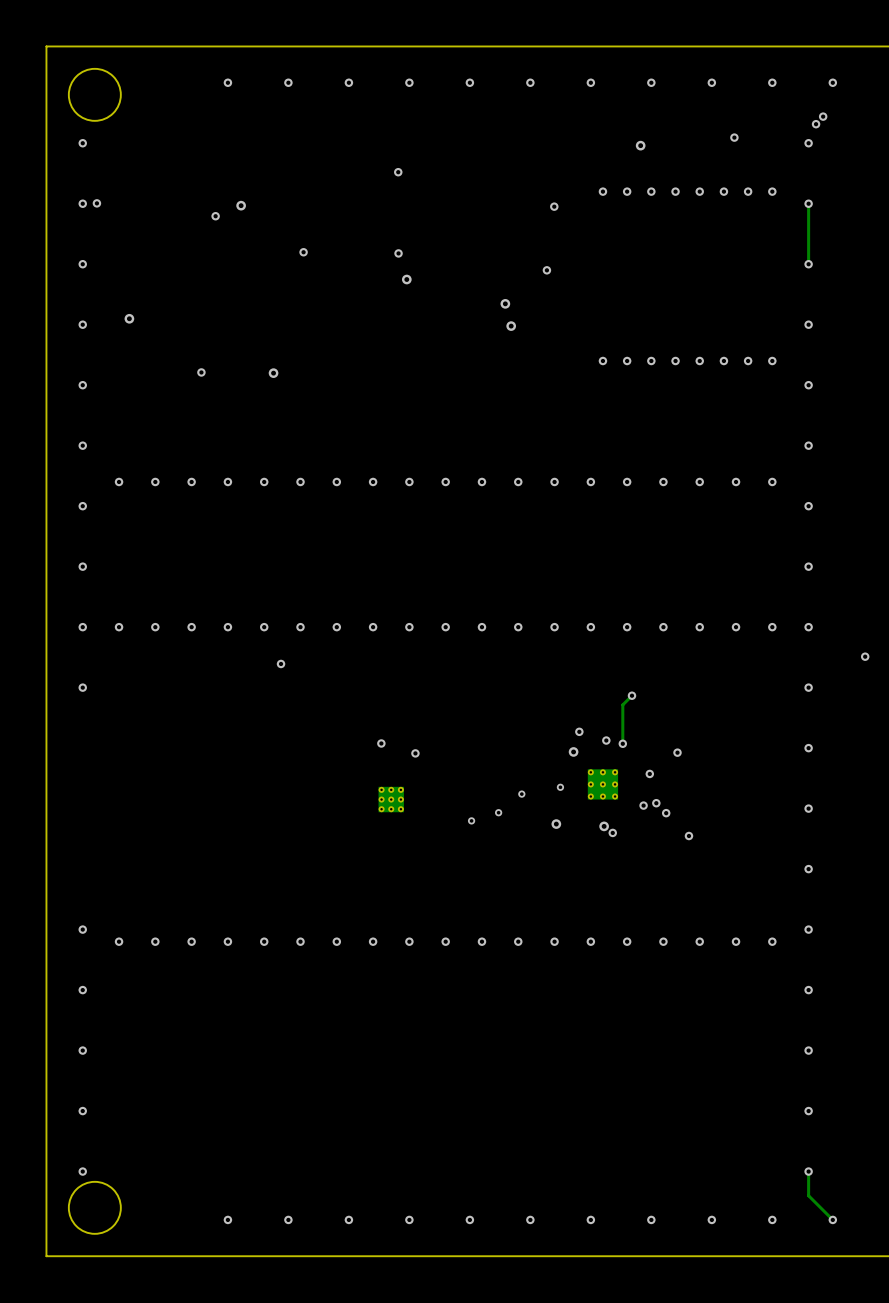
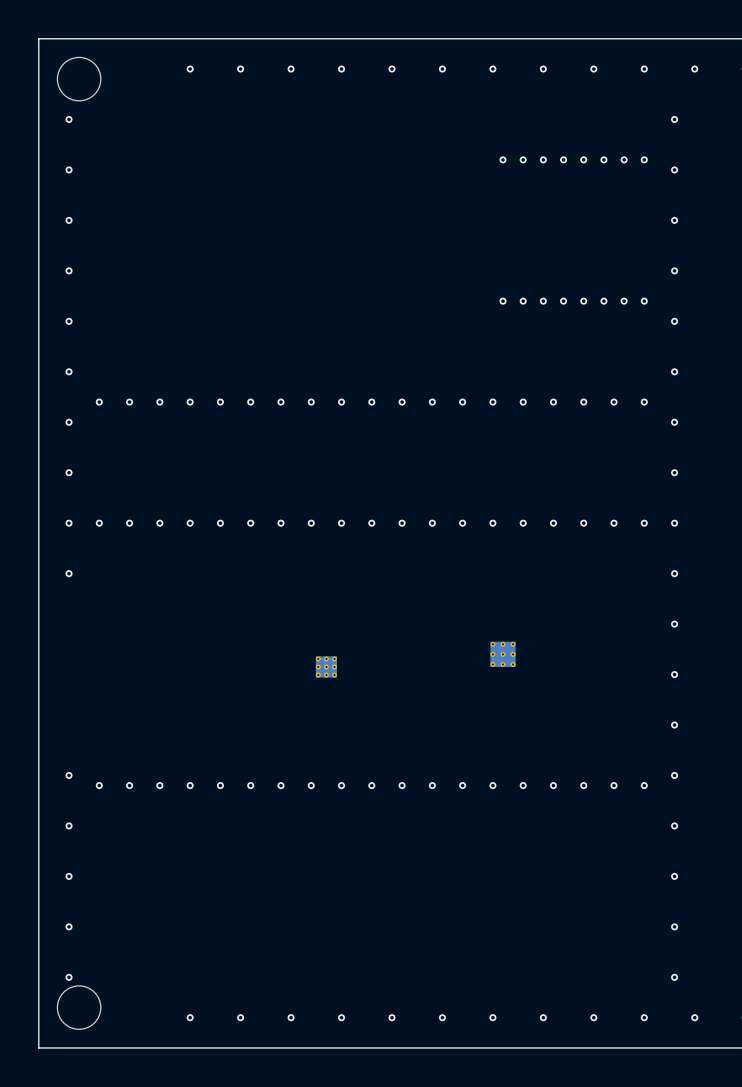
via: (823, 116) -> none
via: (816, 124) -> none
via: (734, 137) -> none
via: (640, 145) -> none
via: (398, 172) -> none
via: (96, 203) -> none
track: (808, 203) (808, 264) -> none
via: (241, 205) -> none
via: (554, 206) -> none
via: (215, 216) -> none
via: (303, 252) -> none
via: (398, 253) -> none
via: (546, 270) -> none
via: (406, 279) -> none
via: (505, 303) -> none
via: (129, 318) -> none
via: (511, 326) -> none
via: (201, 372) -> none
via: (273, 373) -> none
via: (865, 656) -> none
via: (281, 663) -> none
track: (631, 695) (622, 704) (622, 743) -> none
via: (631, 695) -> none
via: (579, 731) -> none
via: (606, 740) -> none
via: (381, 743) -> none
via: (622, 743) -> none
via: (573, 751) -> none
via: (677, 752) -> none
via: (415, 753) -> none
via: (649, 773) -> none
via: (560, 787) -> none
via: (521, 794) -> none
via: (656, 803) -> none
via: (643, 805) -> none
via: (498, 812) -> none
via: (666, 813) -> none
via: (471, 820) -> none
via: (556, 824) -> none
via: (604, 826) -> none
via: (612, 832) -> none
via: (688, 836) -> none
track: (808, 1171) (808, 1195) (832, 1219) -> none

